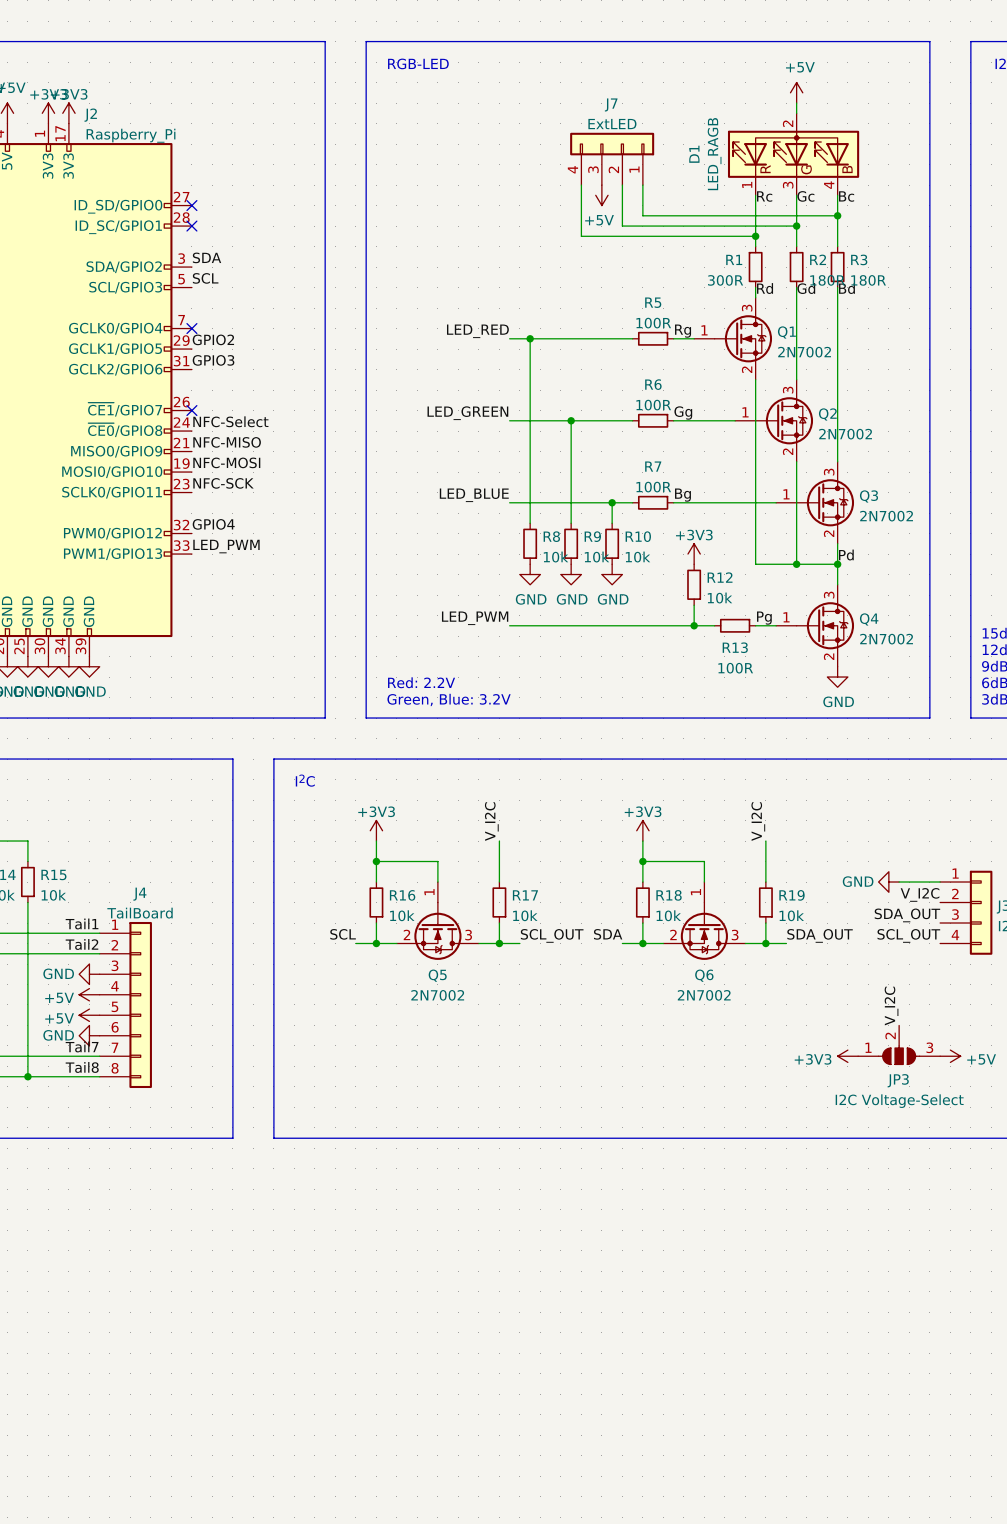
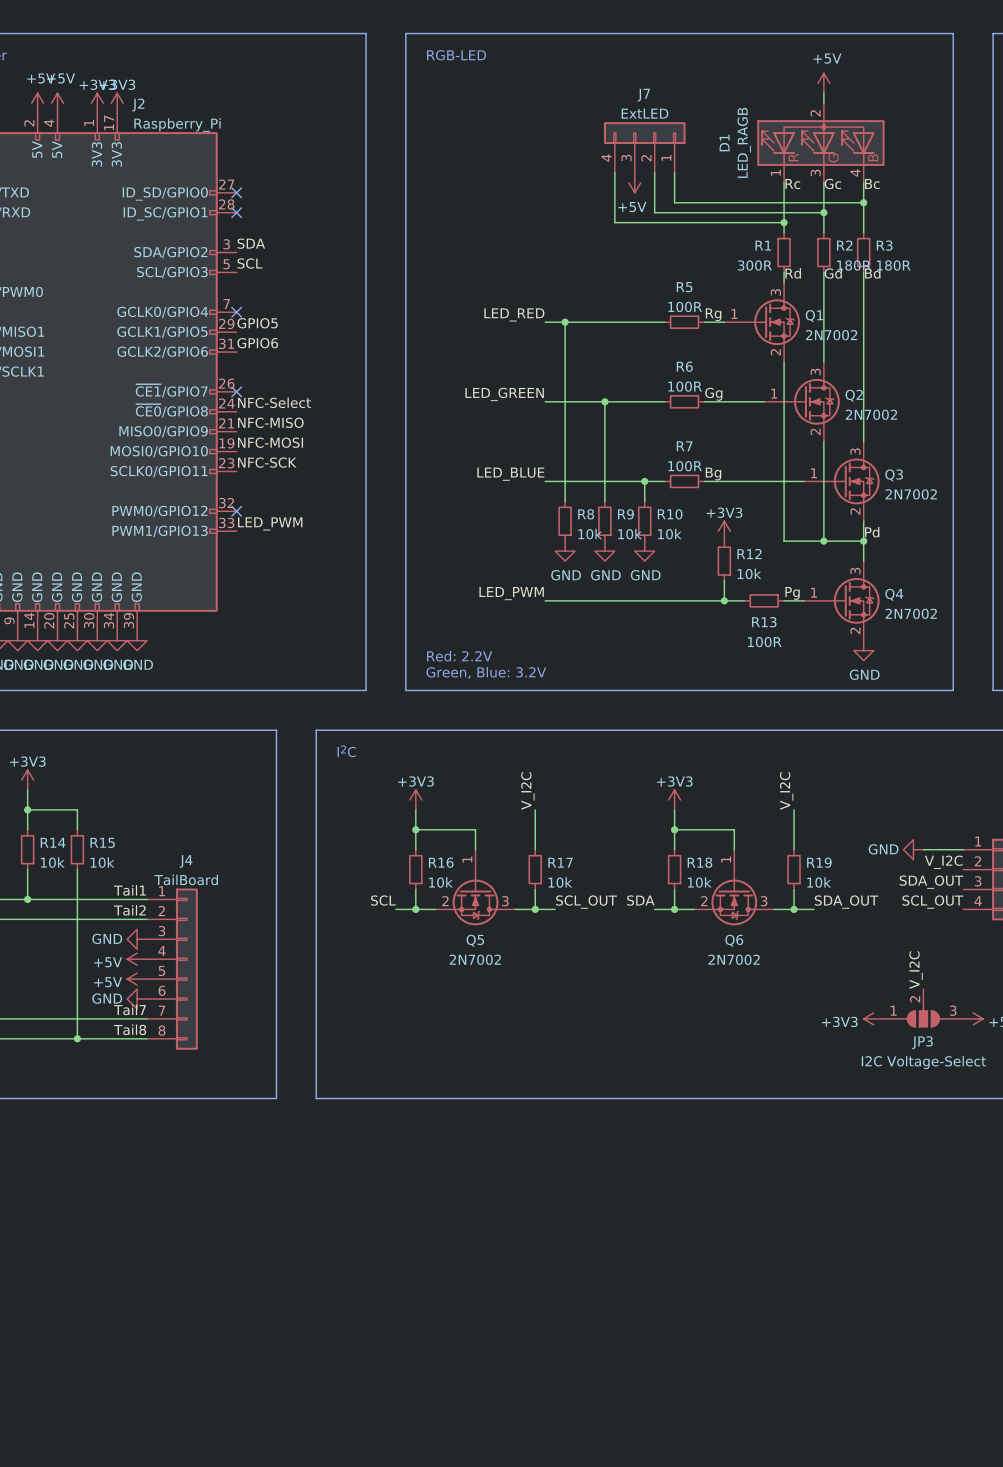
label: GPIO2 (213, 339) -> GPIO5 (257, 323)
label: GPIO3 (213, 360) -> GPIO6 (257, 343)
label: GPIO4 (213, 524) -> none
no-connect mark: none -> (236, 511)

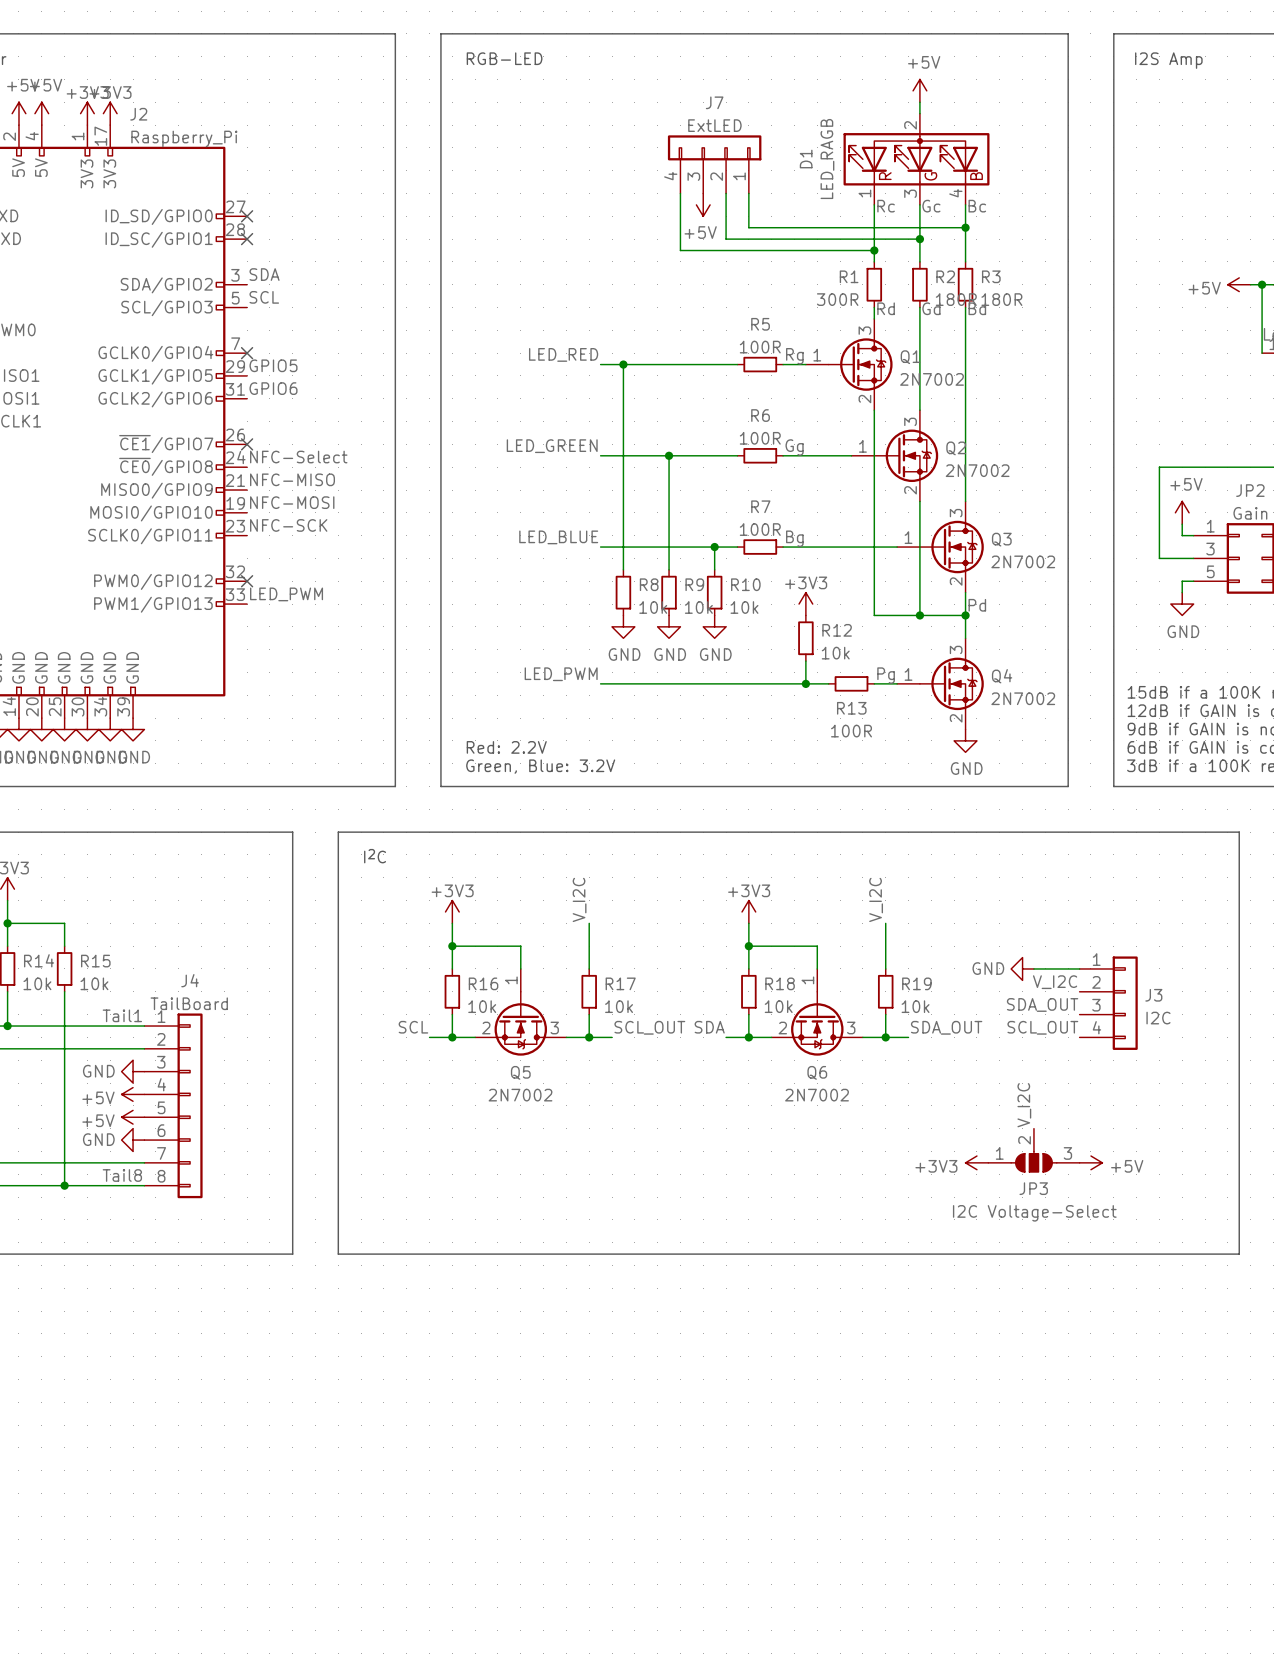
label: Tail2 (129, 910) -> none
label: Tail7 (129, 1009) -> none

